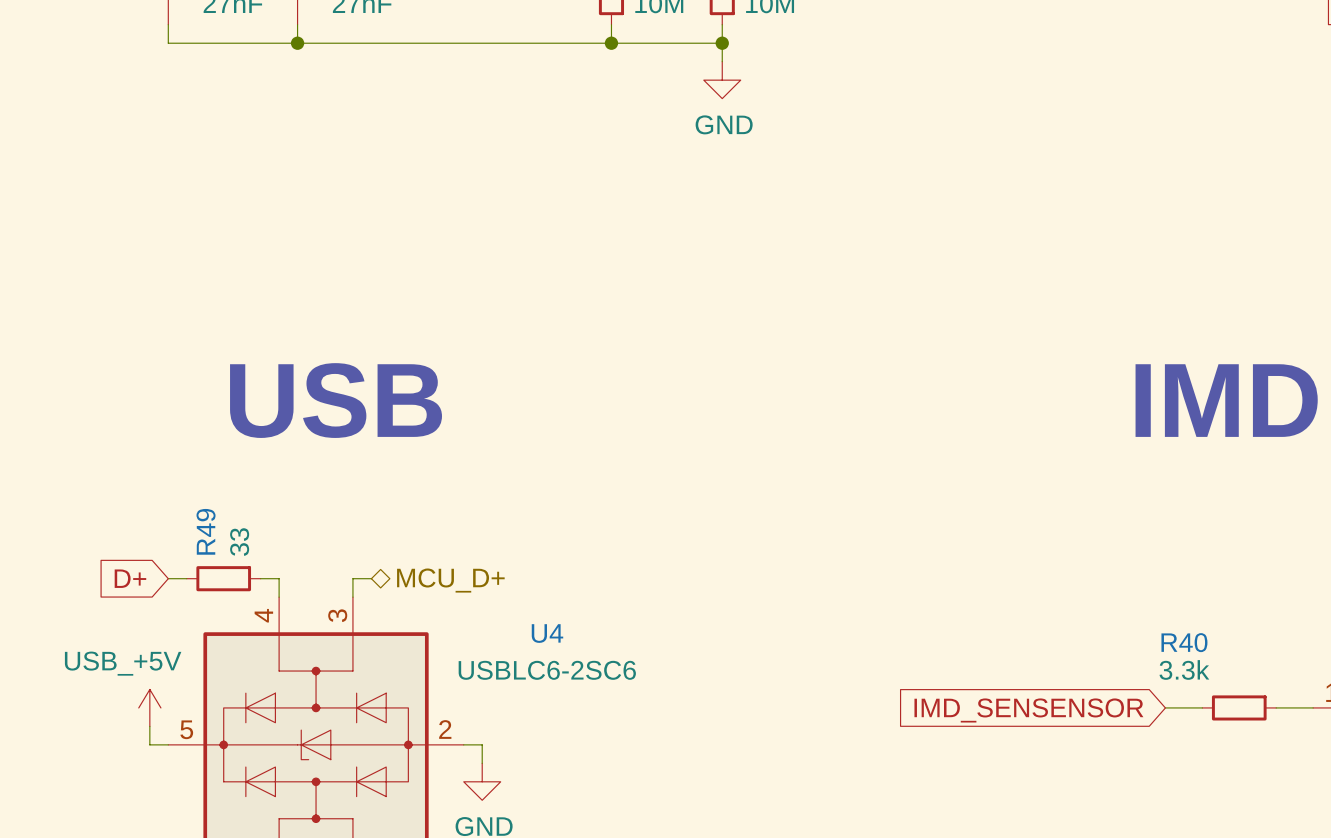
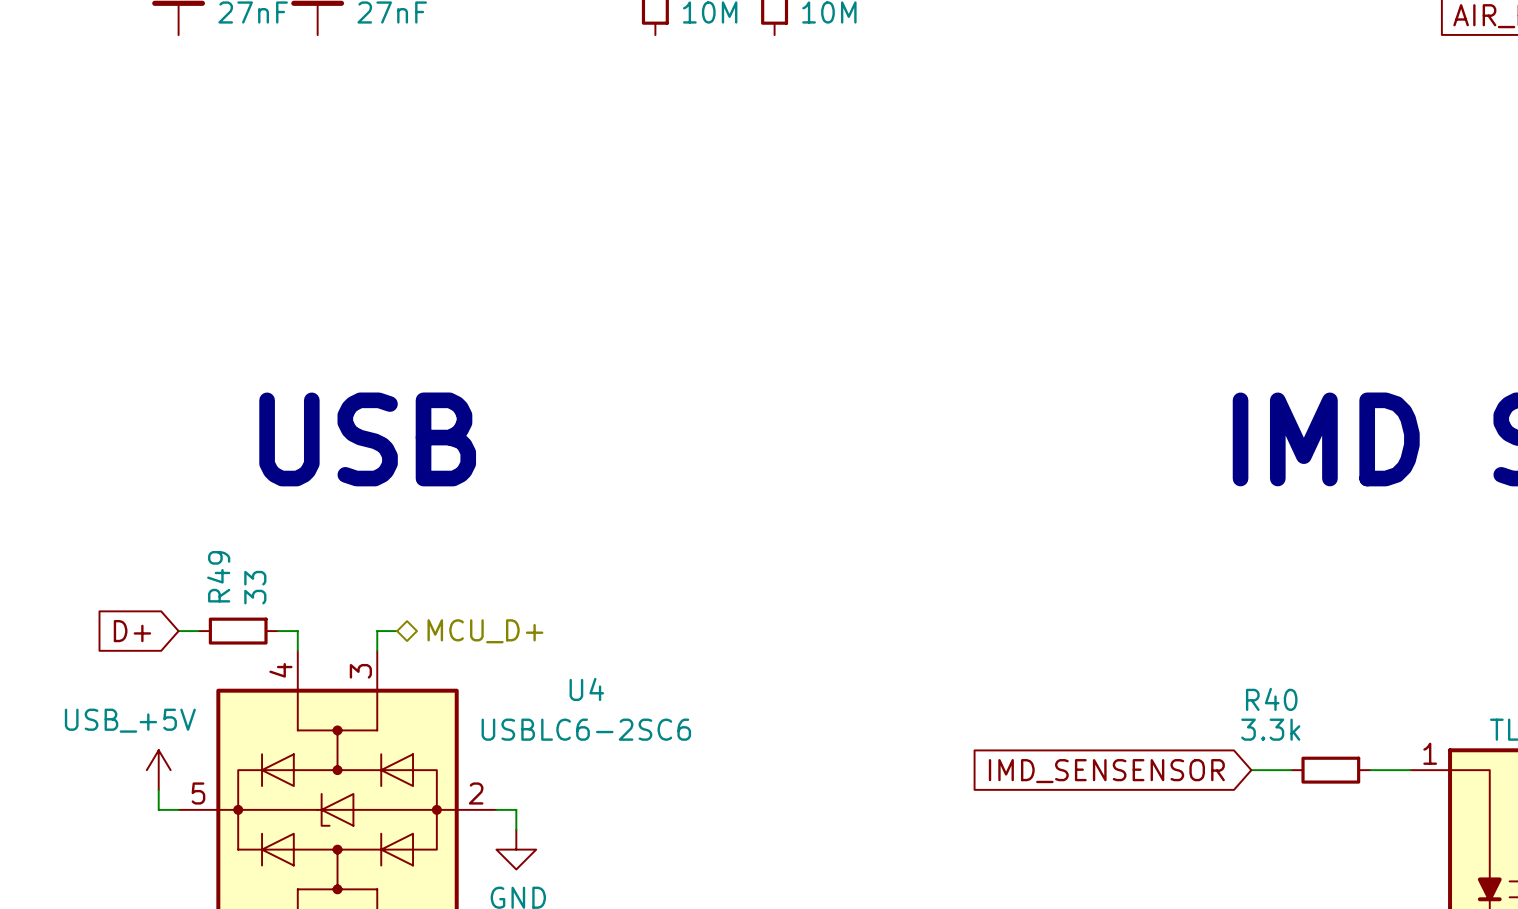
wire: (168, 24) (168, 43) (722, 43) -> none
wire: (297, 24) (297, 43) -> none
wire: (611, 24) (611, 43) -> none
wire: (722, 24) (722, 61) -> none
junction: (297, 43) -> none
junction: (611, 43) -> none
junction: (722, 43) -> none
power symbol: GND (722, 80) -> none

